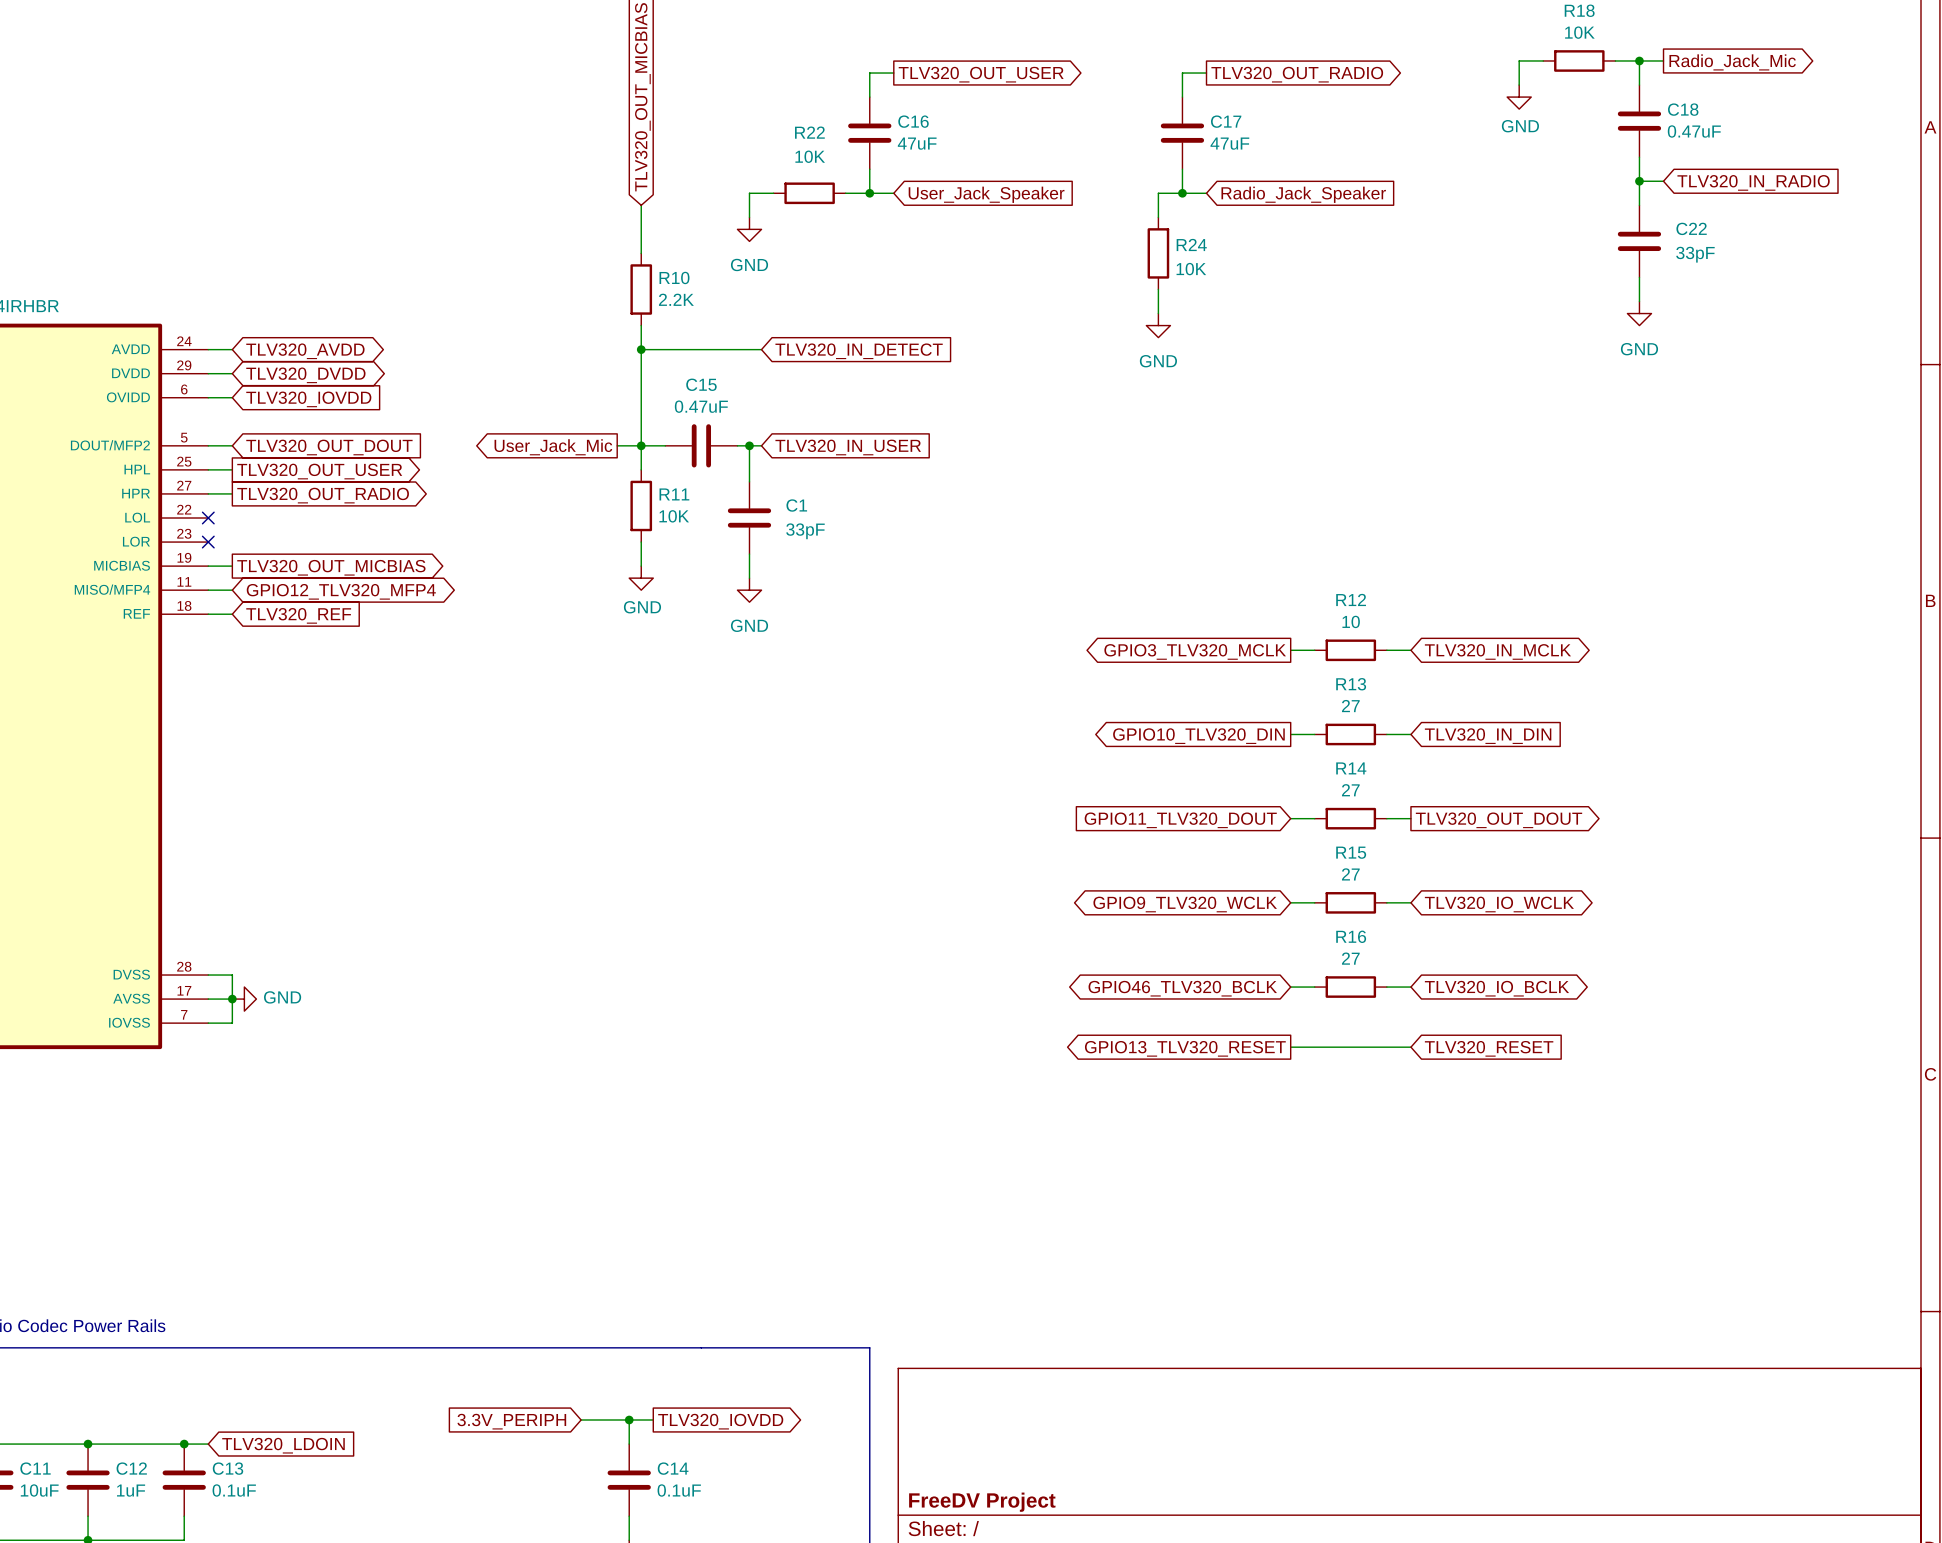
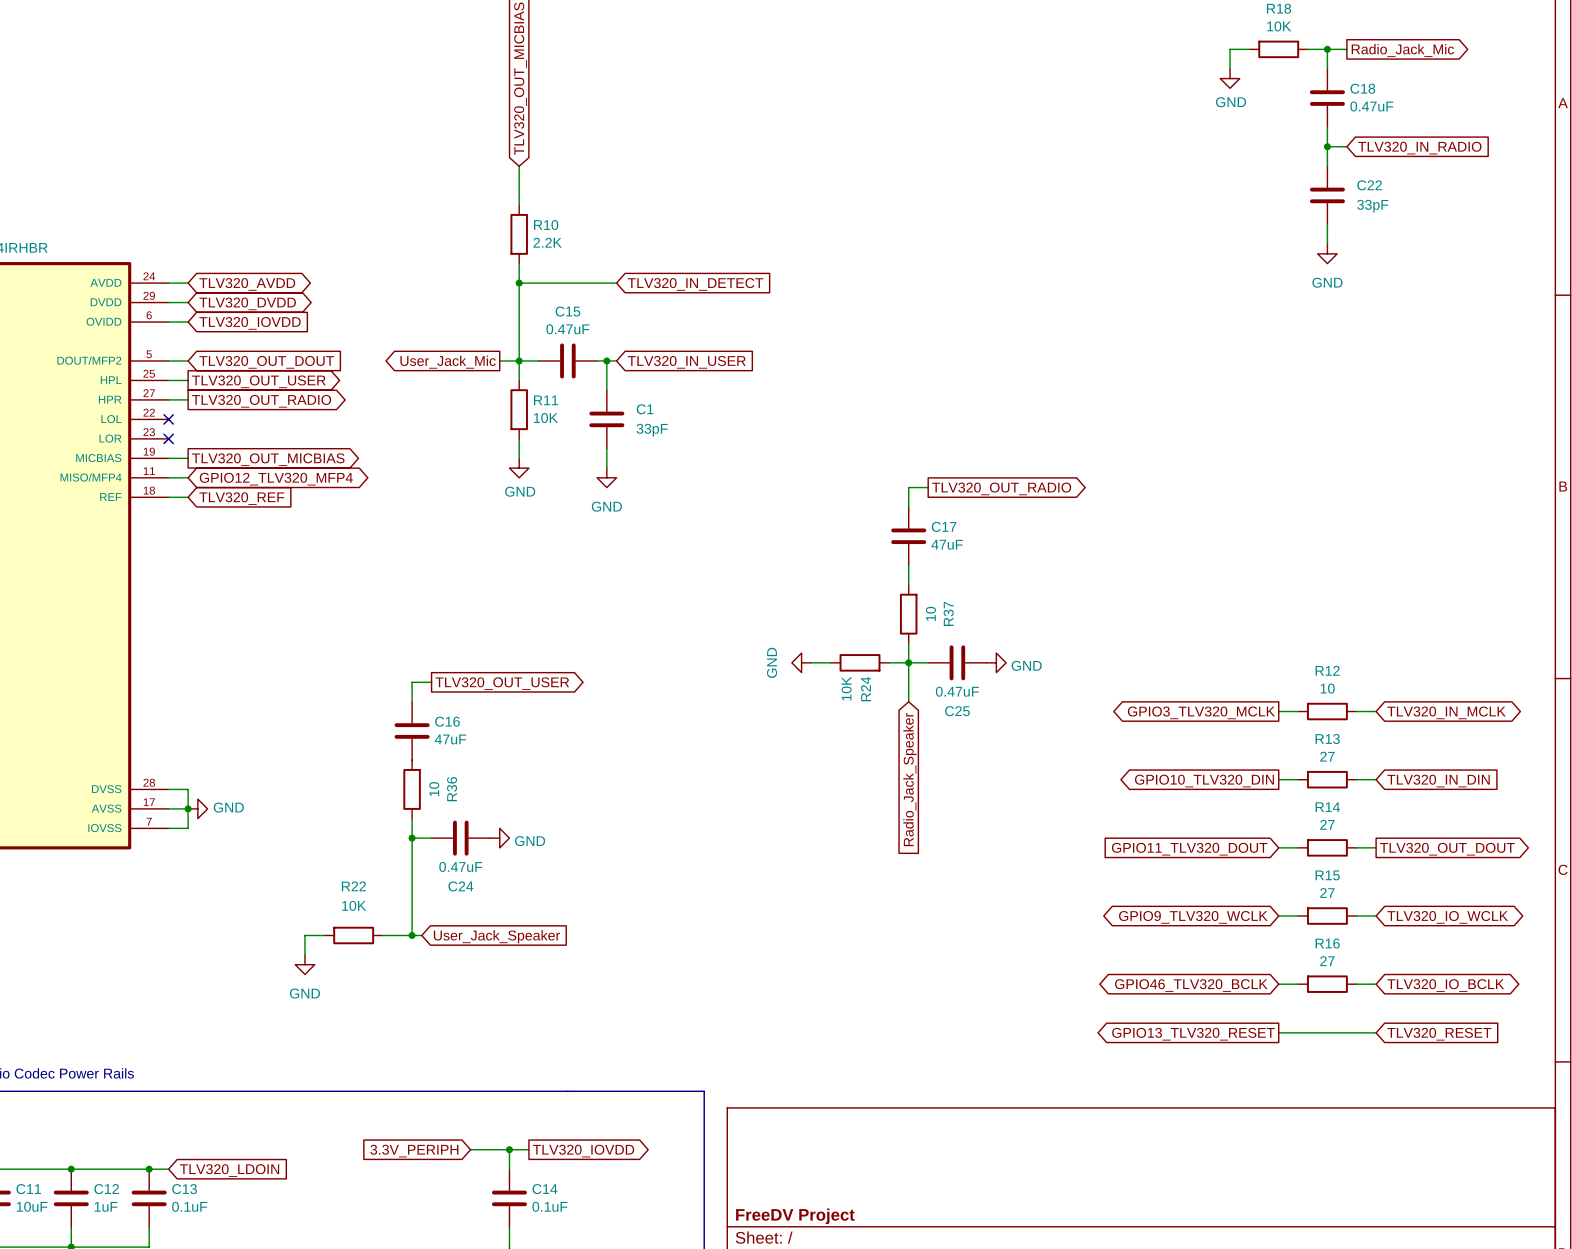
wire: (893, 73) (869, 73) (869, 97) -> none
wire: (1206, 73) (1182, 73) (1182, 97) -> none
global label: TLV320_OUT_USER (981, 74) -> none
global label: TLV320_OUT_RADIO (1297, 74) -> none
C16 position: (869, 133) -> (412, 731)
C17 position: (1182, 133) -> (908, 536)
wire: (869, 169) (869, 193) -> none
wire: (1182, 169) (1182, 193) -> none
wire: (773, 193) (749, 193) (749, 217) -> none
R22 position: (809, 193) -> (353, 935)
wire: (845, 193) (893, 193) -> none
junction: (869, 193) -> none
junction: (1182, 193) -> none
wire: (1206, 193) (1158, 193) (1158, 217) -> none
global label: User_Jack_Speaker (986, 194) -> none
global label: Radio_Jack_Speaker (1303, 194) -> none
power symbol: GND (749, 229) -> none
R24 rotation: 0° (1158, 253) -> 90° clockwise (860, 662)
R24 position: (1158, 253) -> (860, 662)
wire: (1158, 289) (1158, 313) -> none
power symbol: GND (1158, 325) -> none
wire: none -> (928, 487) (908, 487) (908, 507)
global label: none -> TLV320_OUT_RADIO (1001, 488)
wire: (1290, 650) (1314, 650) -> none
R12 position: (1350, 650) -> (1327, 711)
wire: (1386, 650) (1410, 650) -> none
global label: GPIO3_TLV320_MCLK (1195, 651) -> none
global label: TLV320_IN_MCLK (1497, 651) -> none
wire: none -> (908, 565) (908, 584)
wire: (1290, 734) (1314, 734) -> none
R13 position: (1350, 734) -> (1327, 779)
wire: (1386, 734) (1410, 734) -> none
global label: GPIO10_TLV320_DIN (1198, 736) -> none
global label: TLV320_IN_DIN (1488, 736) -> none
R37: none -> 10 (908, 614)
wire: none -> (908, 643) (908, 701)
power symbol: none -> GND (801, 662)
wire: none -> (811, 662) (830, 662)
wire: none -> (889, 662) (928, 662)
junction: none -> (908, 662)
C25: none -> 0.47uF (957, 662)
power symbol: none -> GND (996, 662)
wire: (1290, 818) (1314, 818) -> none
R14 position: (1350, 818) -> (1327, 847)
wire: (1386, 818) (1410, 818) -> (1278, 711) (1298, 711)
global label: GPIO11_TLV320_DOUT (1180, 820) -> none
global label: TLV320_OUT_DOUT (1499, 820) -> none
wire: none -> (431, 682) (412, 682) (412, 701)
global label: none -> TLV320_OUT_USER (502, 683)
wire: none -> (1356, 711) (1376, 711)
global label: none -> TLV320_IN_MCLK (1446, 712)
wire: (1290, 902) (1314, 902) -> none
R15 position: (1350, 902) -> (1327, 916)
wire: (1386, 902) (1410, 902) -> (1278, 779) (1298, 779)
global label: GPIO9_TLV320_WCLK (1185, 904) -> none
global label shape: bidirectional (1499, 904) -> output (1201, 712)
global label: TLV320_IO_WCLK (1499, 904) -> GPIO3_TLV320_MCLK (1201, 712)
global label: none -> Radio_Jack_Speaker (909, 779)
wire: none -> (1356, 779) (1376, 779)
global label: none -> GPIO10_TLV320_DIN (1204, 781)
global label: none -> TLV320_IN_DIN (1438, 781)
R36: none -> 10 (412, 789)
wire: (1290, 987) (1314, 987) -> none
R16 position: (1350, 987) -> (1327, 984)
wire: (1386, 987) (1410, 987) -> (1278, 847) (1298, 847)
global label: GPIO46_TLV320_BCLK (1182, 988) -> none
global label: TLV320_IO_BCLK (1496, 988) -> none
wire: none -> (412, 818) (412, 935)
wire: none -> (412, 838) (431, 838)
junction: none -> (412, 838)
C24: none -> 0.47uF (460, 838)
power symbol: none -> GND (499, 838)
wire: (1290, 1047) (1410, 1047) -> none
wire: none -> (1356, 847) (1376, 847)
global label: GPIO13_TLV320_RESET (1185, 1048) -> none
global label: none -> GPIO11_TLV320_DOUT (1189, 849)
global label: TLV320_RESET (1489, 1048) -> none
global label: none -> TLV320_OUT_DOUT (1447, 849)
wire: none -> (1278, 916) (1298, 916)
wire: none -> (1356, 916) (1376, 916)
global label: none -> GPIO9_TLV320_WCLK (1193, 917)
global label: none -> TLV320_IO_WCLK (1447, 917)
wire: none -> (324, 935) (304, 935) (304, 954)
wire: none -> (382, 935) (421, 935)
junction: none -> (412, 935)
global label: none -> User_Jack_Speaker (496, 936)
power symbol: none -> GND (304, 964)
wire: none -> (1278, 984) (1298, 984)
wire: none -> (1356, 984) (1376, 984)
global label: none -> GPIO46_TLV320_BCLK (1191, 985)
global label: none -> TLV320_IO_BCLK (1445, 985)
wire: none -> (1278, 1032) (1376, 1032)
global label: none -> GPIO13_TLV320_RESET (1193, 1034)
global label: none -> TLV320_RESET (1439, 1034)

